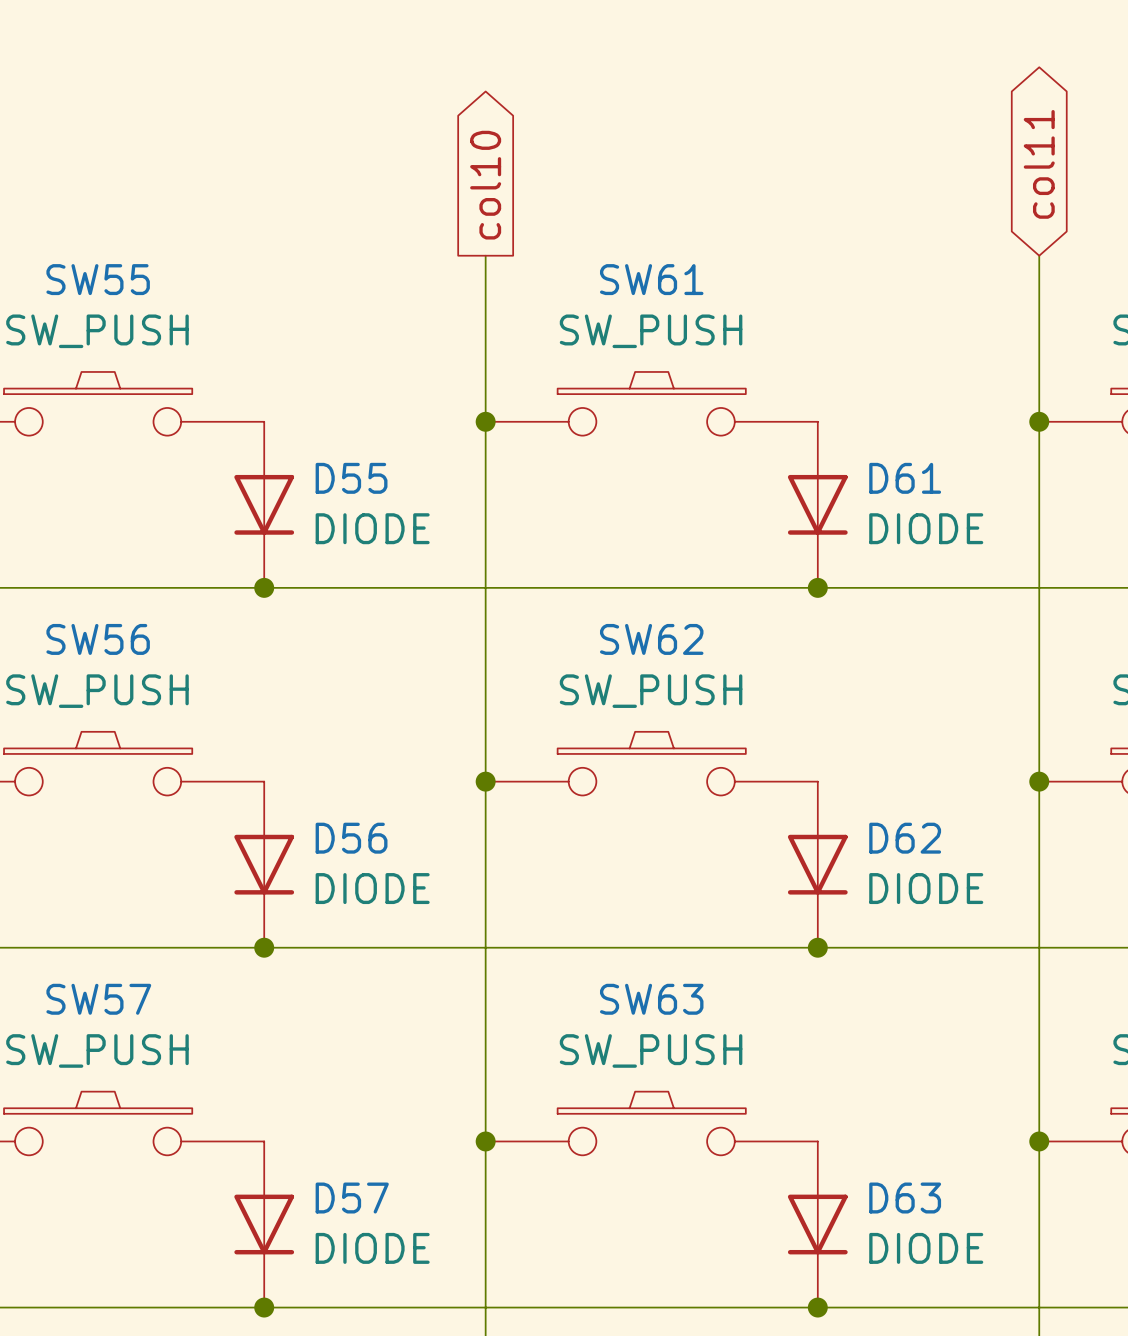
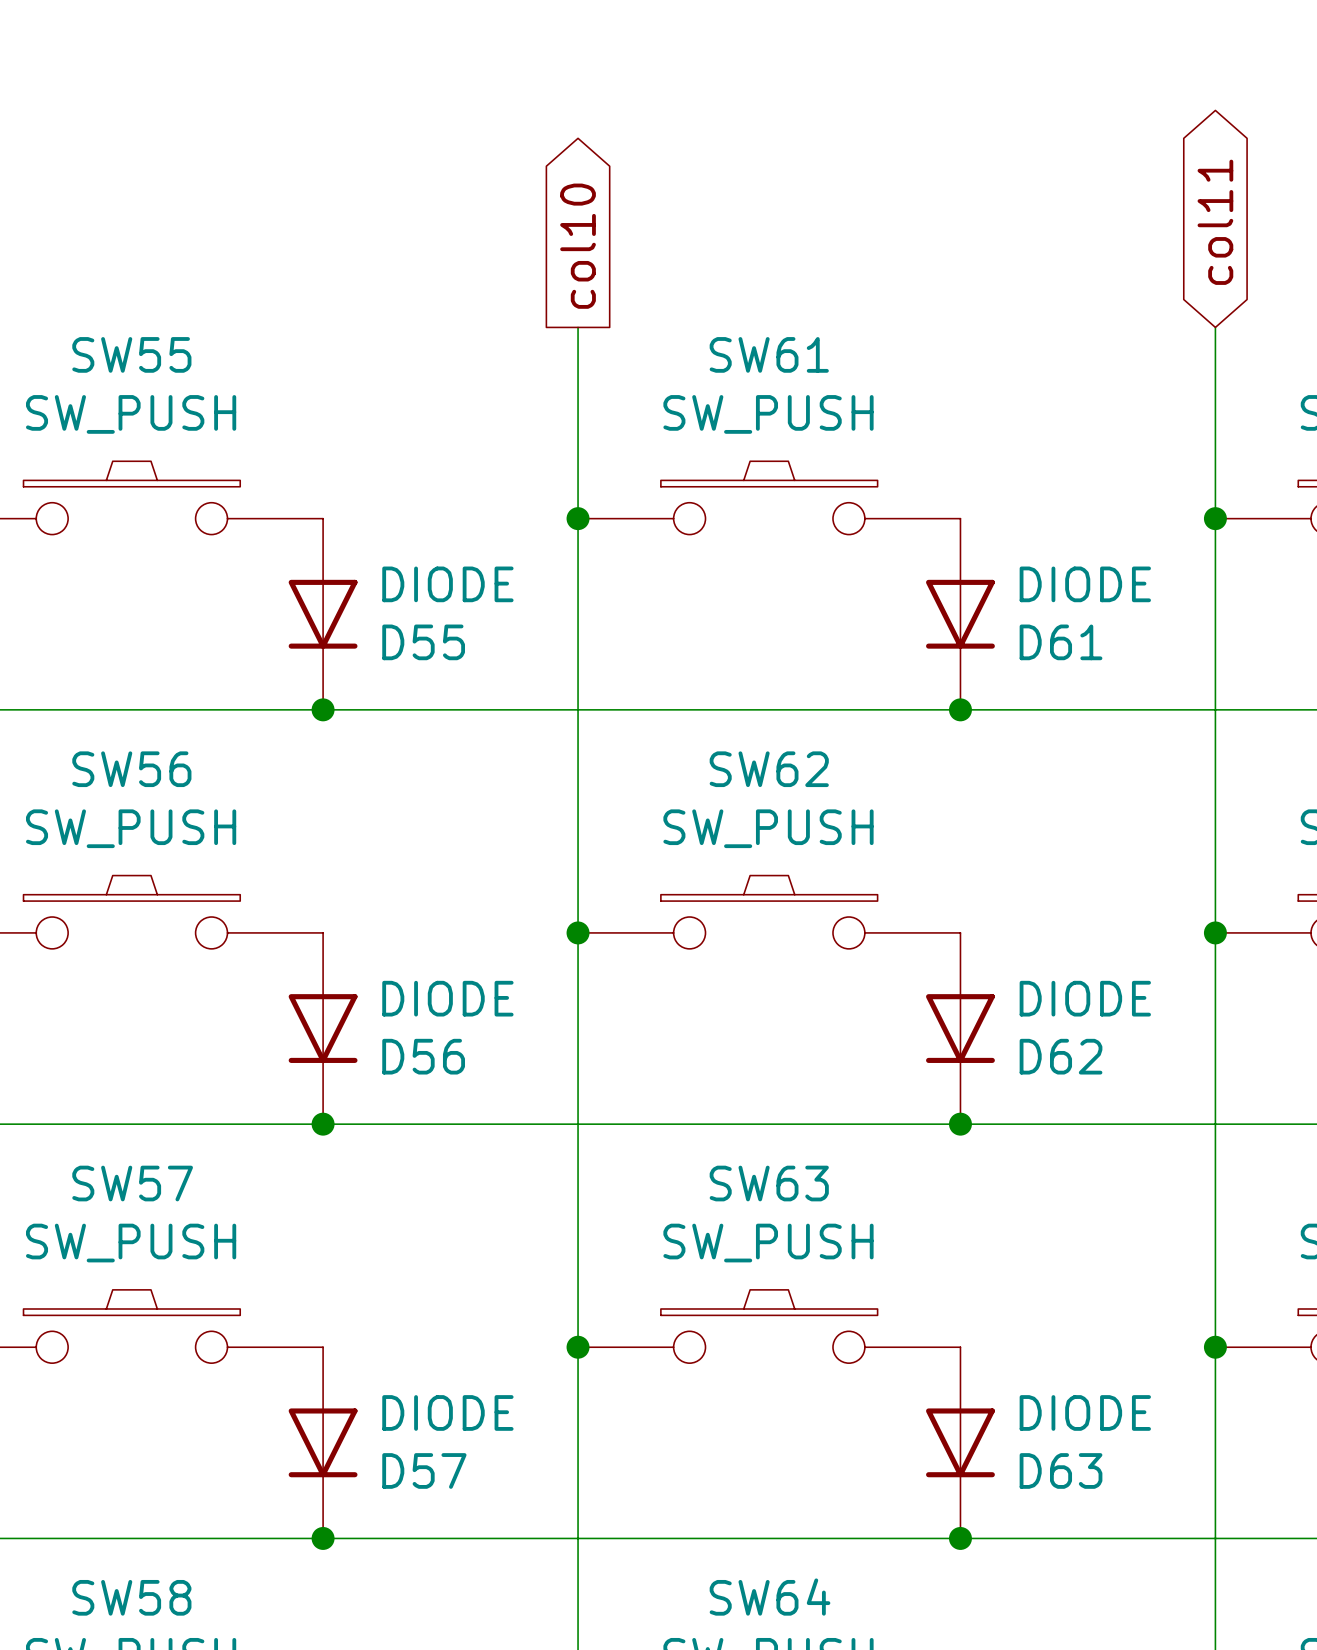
D55 name position: D55 (351, 478) -> D55 (423, 642)
D61 name position: D61 (905, 478) -> D61 (1061, 642)
D55 value position: DIODE (372, 528) -> DIODE (447, 584)
D61 value position: DIODE (926, 528) -> DIODE (1085, 584)
D56 name position: D56 (351, 838) -> D56 (423, 1056)
D62 name position: D62 (905, 838) -> D62 (1061, 1056)
D56 value position: DIODE (372, 888) -> DIODE (447, 998)
D62 value position: DIODE (926, 888) -> DIODE (1085, 998)
D57 name position: D57 (352, 1198) -> D57 (424, 1470)
D63 name position: D63 (905, 1198) -> D63 (1061, 1470)
D57 value position: DIODE (372, 1248) -> DIODE (447, 1412)
D63 value position: DIODE (926, 1248) -> DIODE (1085, 1412)

